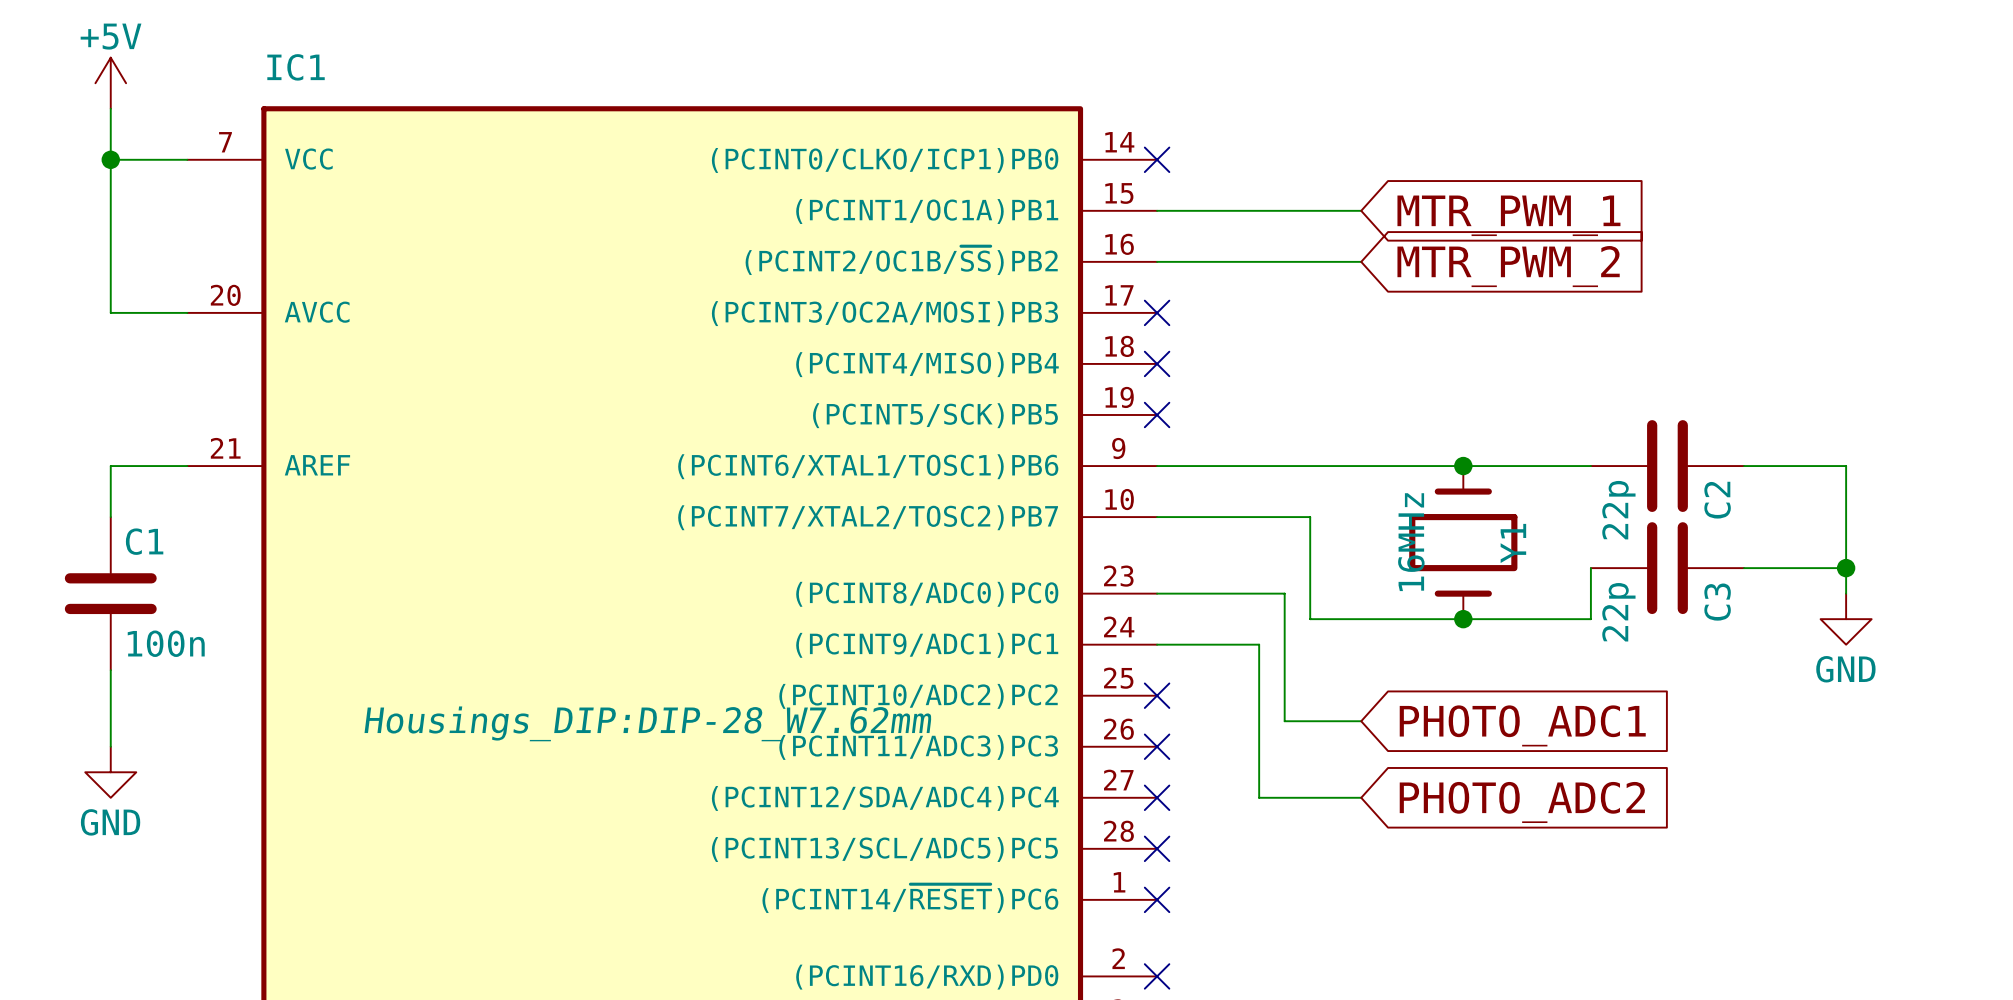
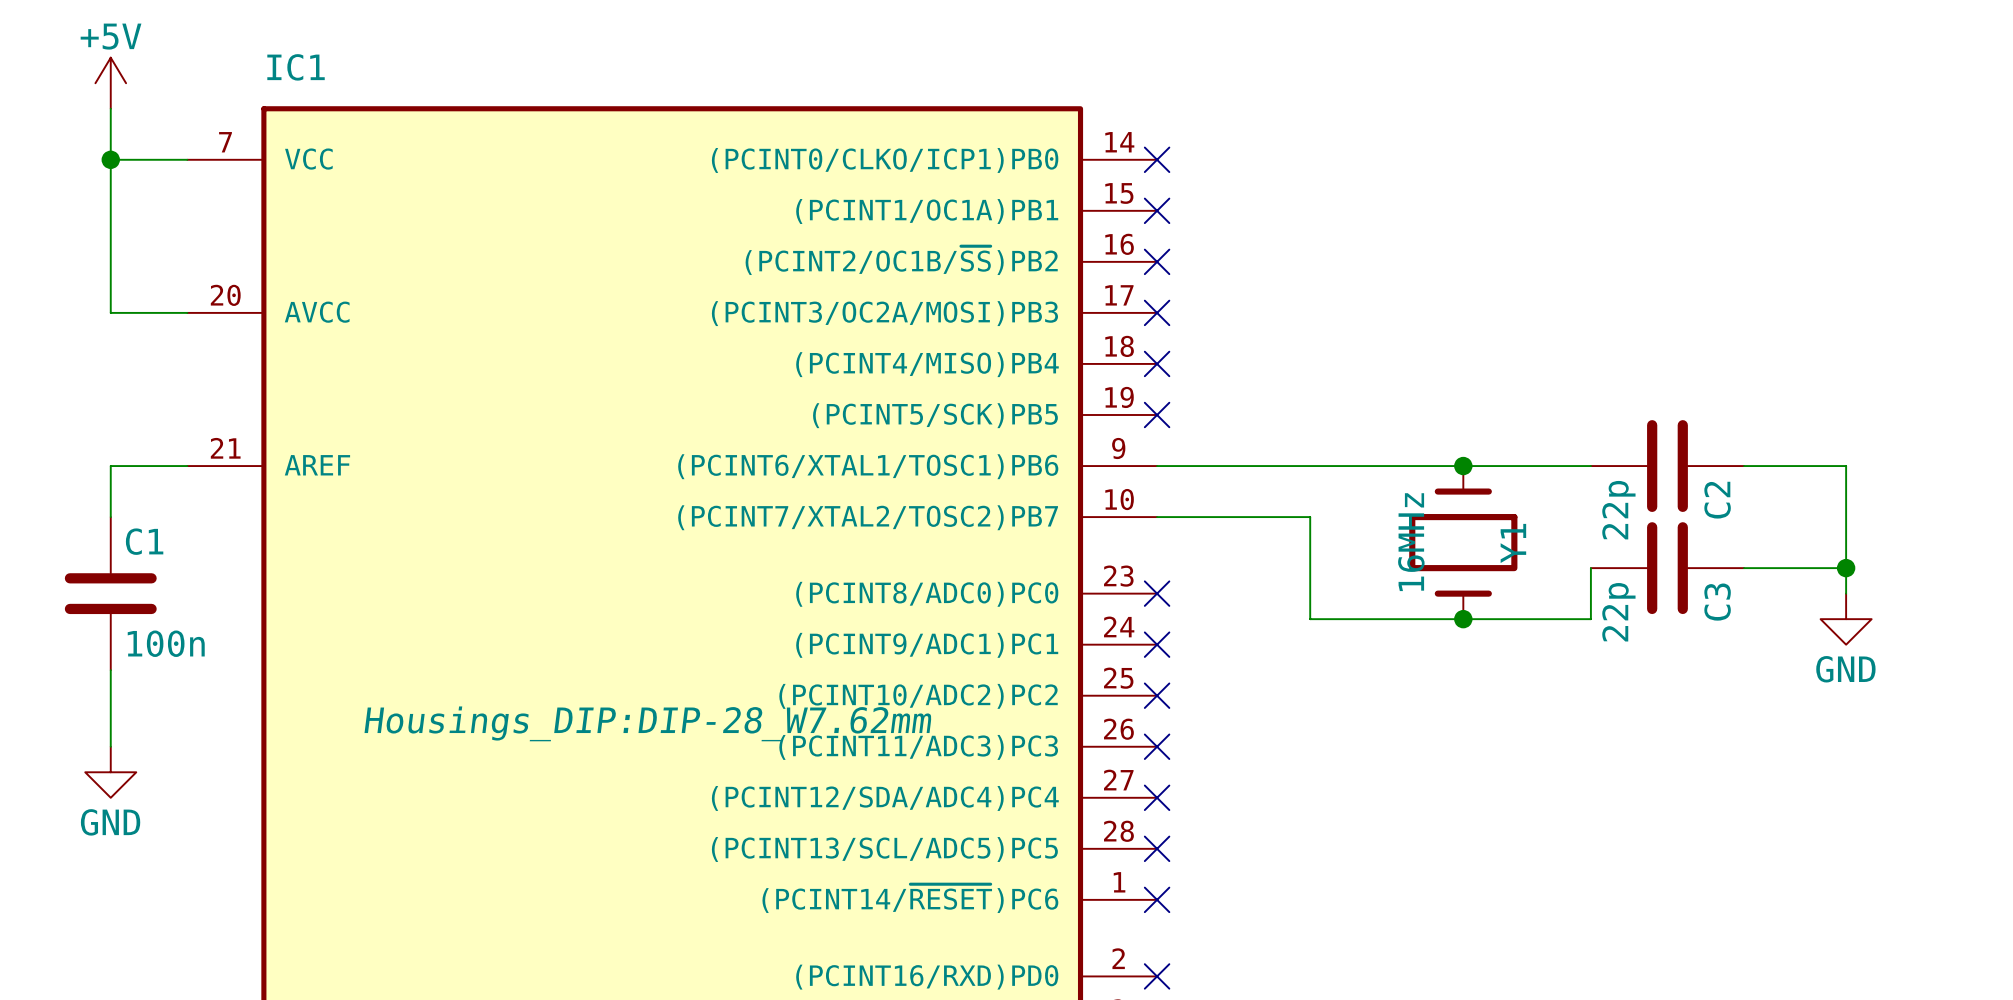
wire: (1157, 210) (1361, 210) -> none
no-connect mark: none -> (1157, 210)
global label: MTR_PWM_1 (1508, 215) -> none
wire: (1157, 261) (1361, 261) -> none
no-connect mark: none -> (1157, 261)
global label: MTR_PWM_2 (1508, 266) -> none
wire: (1157, 593) (1284, 593) (1284, 721) (1361, 721) -> none
no-connect mark: none -> (1157, 593)
wire: (1157, 644) (1259, 644) (1259, 797) (1361, 797) -> none
no-connect mark: none -> (1157, 644)
global label: PHOTO_ADC1 (1522, 725) -> none
global label: PHOTO_ADC2 (1522, 802) -> none

